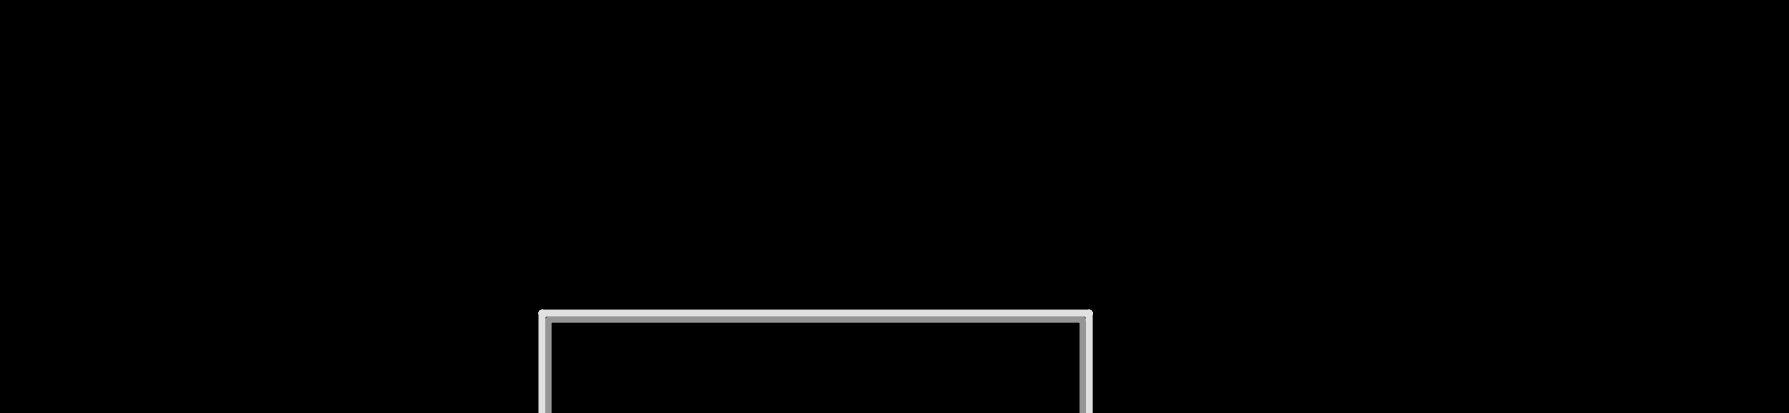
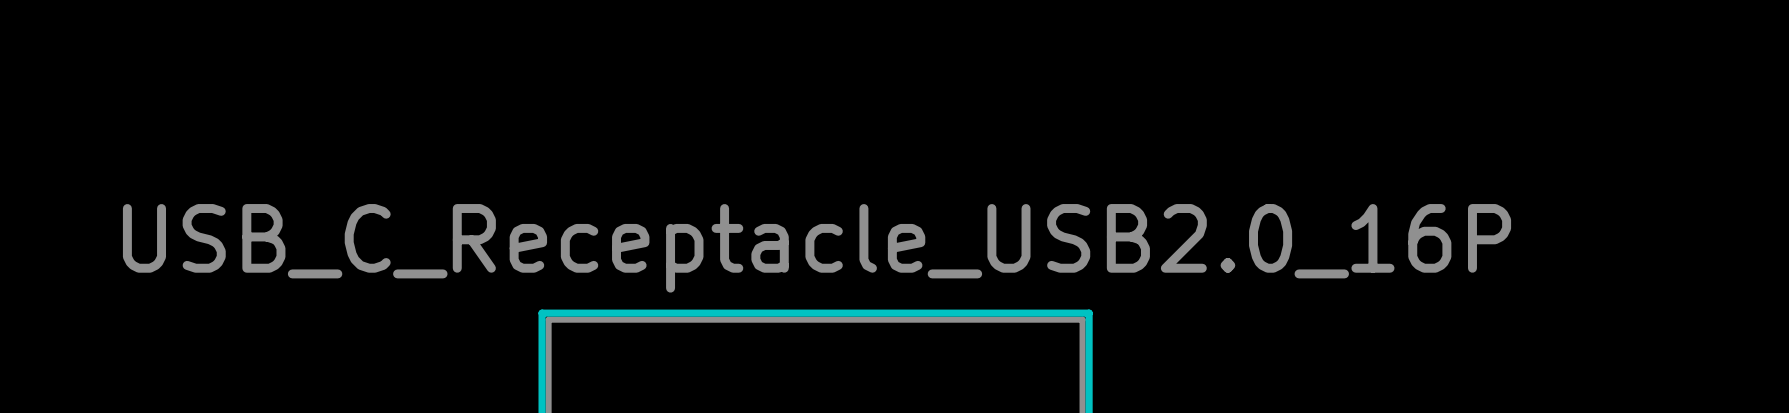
part value: none -> USB_C_Receptacle_USB2.0_16P (817, 248)

